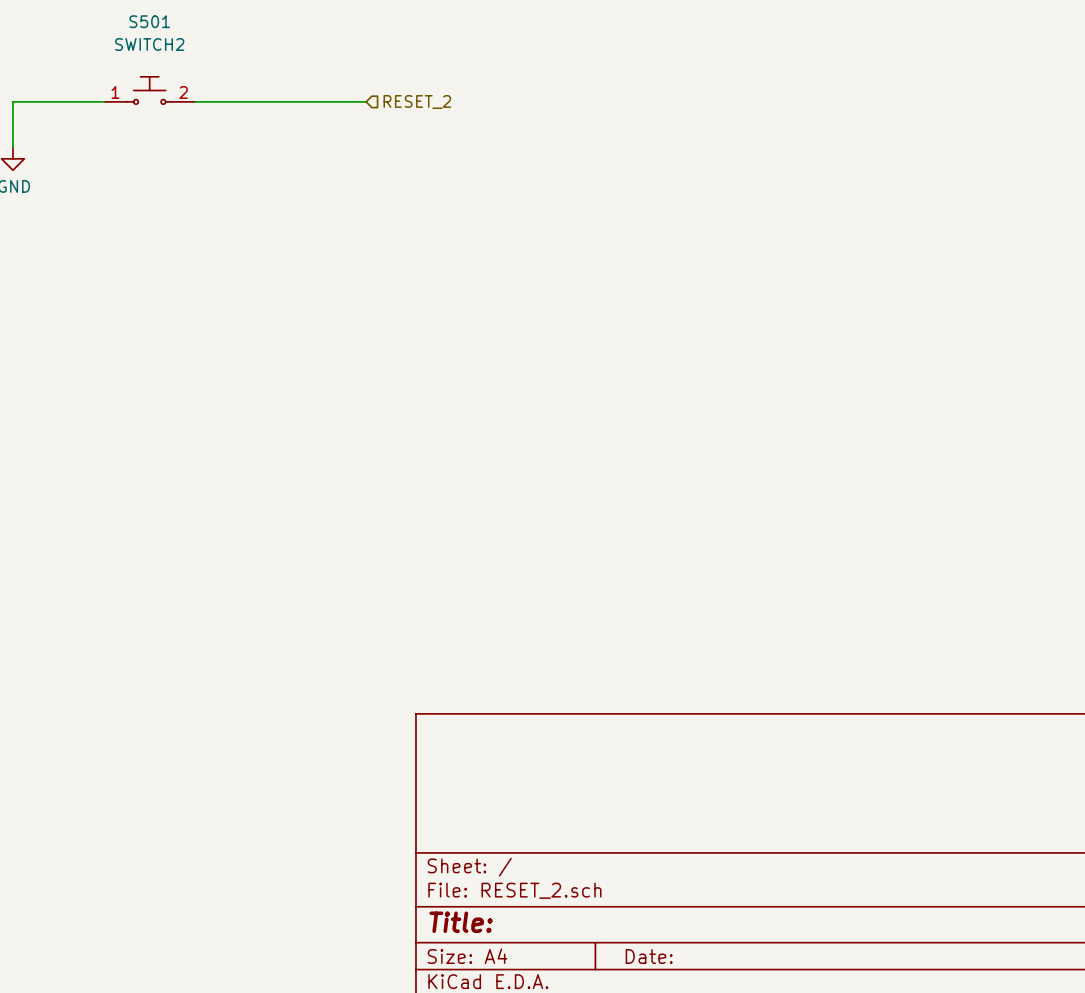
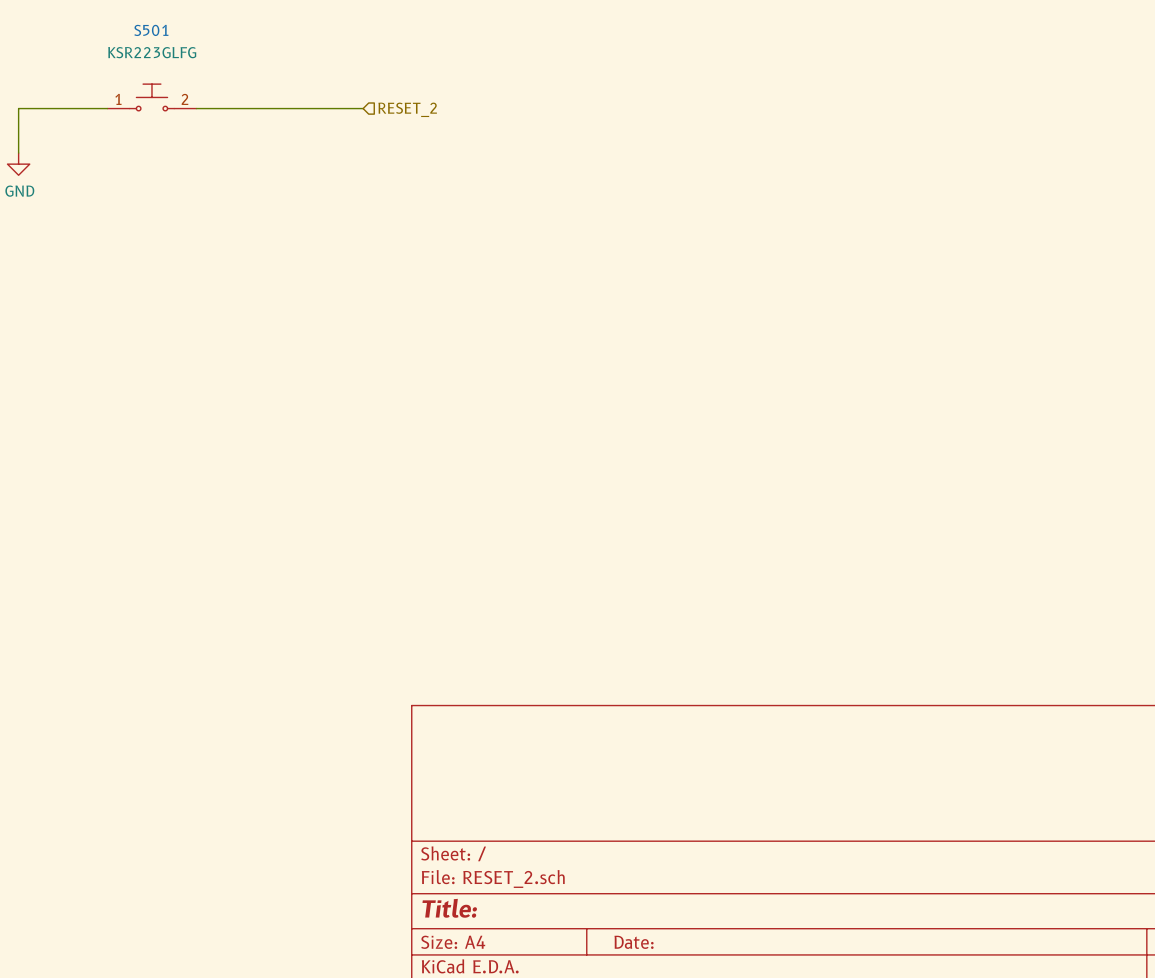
S501 value: SWITCH2 (149, 44) -> KSR223GLFG (152, 52)

